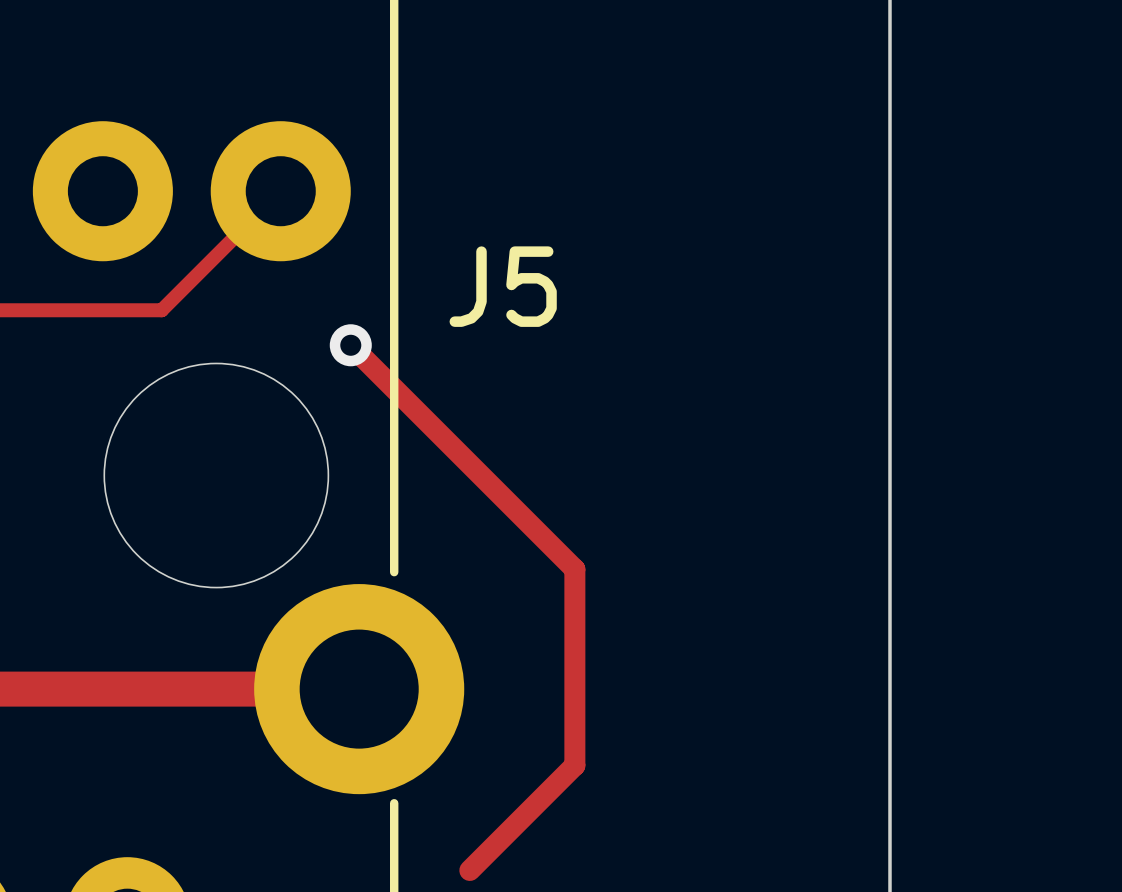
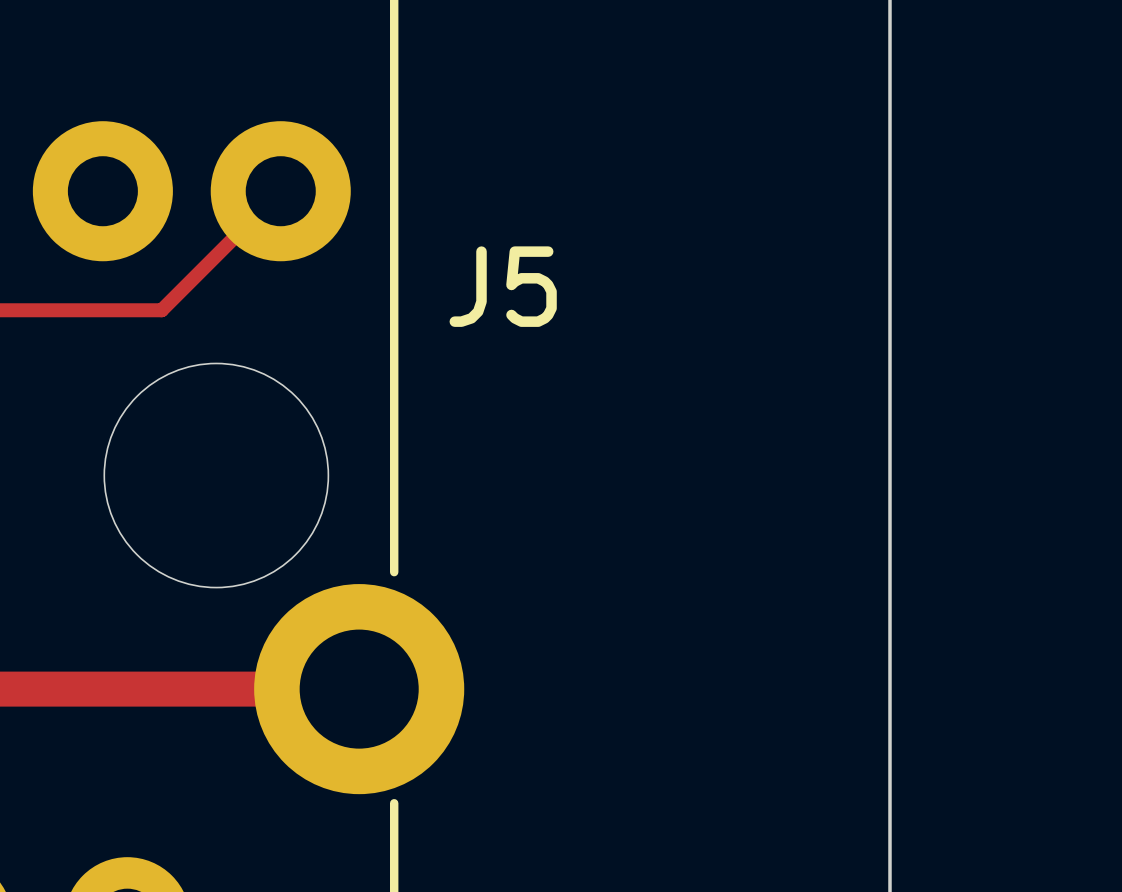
track: (350, 345) (574, 569) (574, 765) (469, 870) -> none
via: (350, 345) -> none

